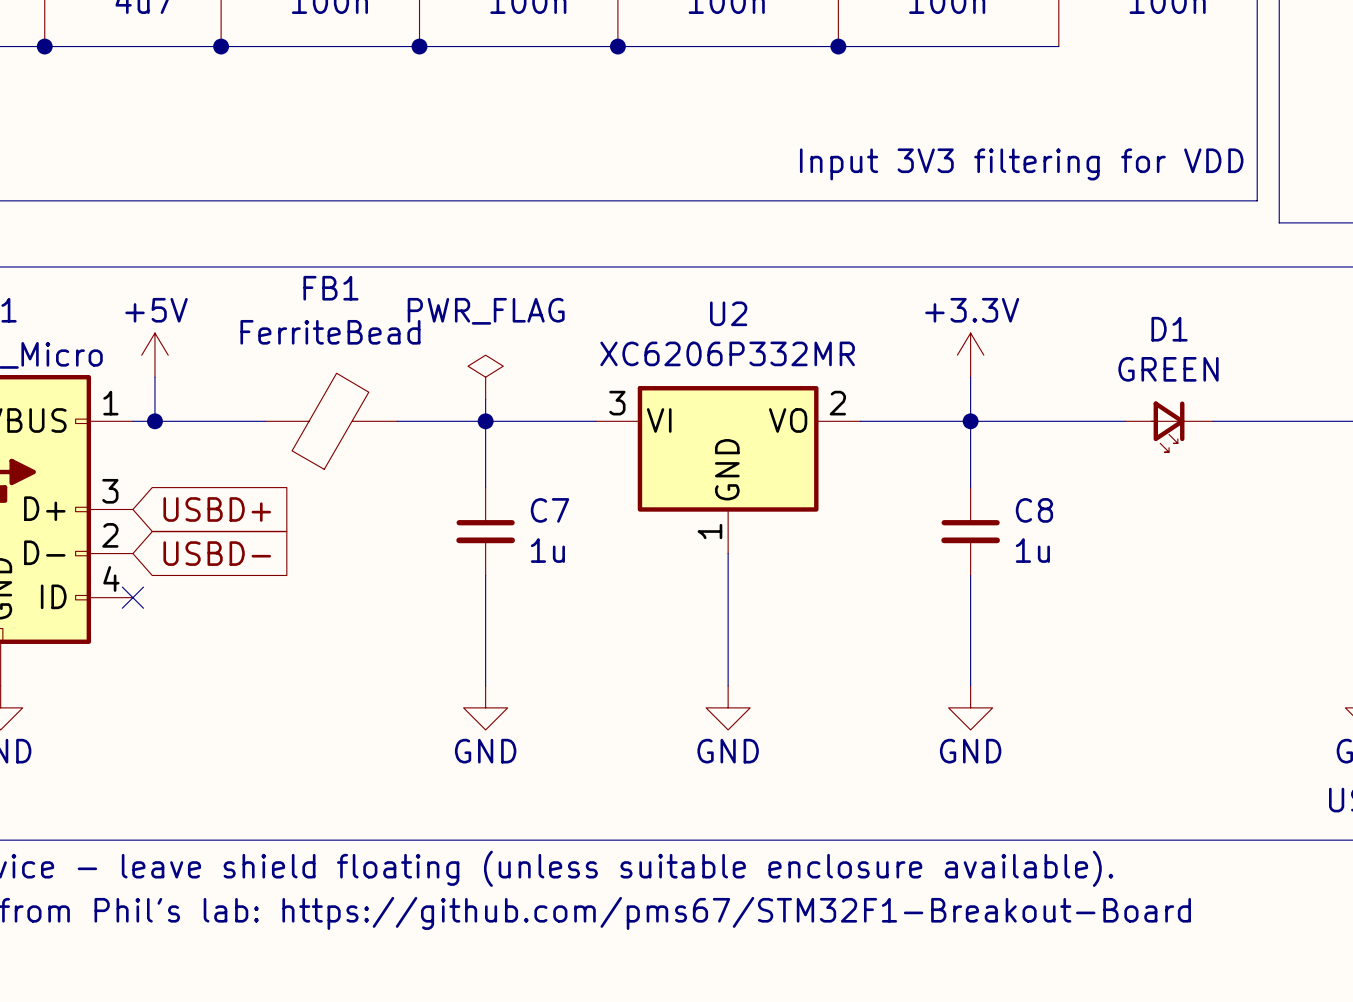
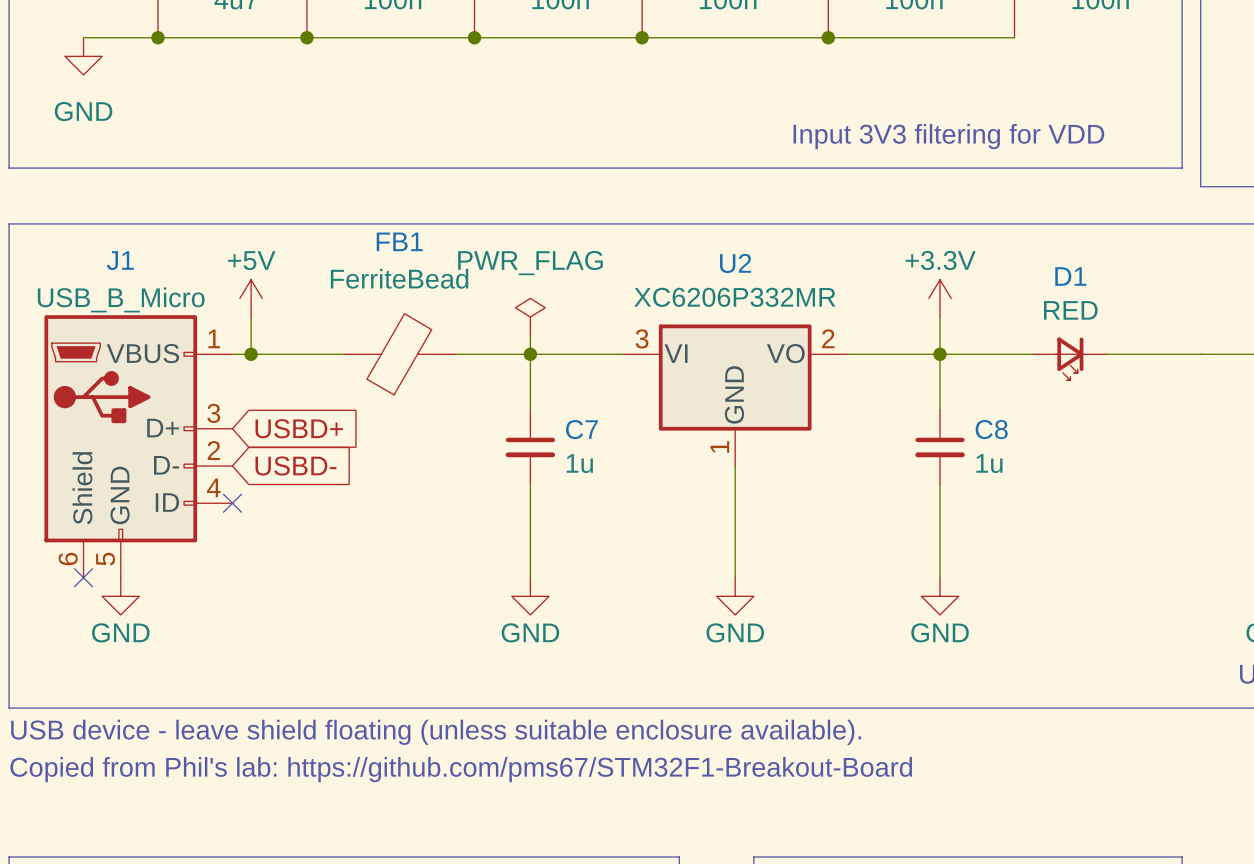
D1 value: GREEN (1168, 369) -> RED (1070, 310)
D1 position: (1169, 426) -> (1070, 358)

